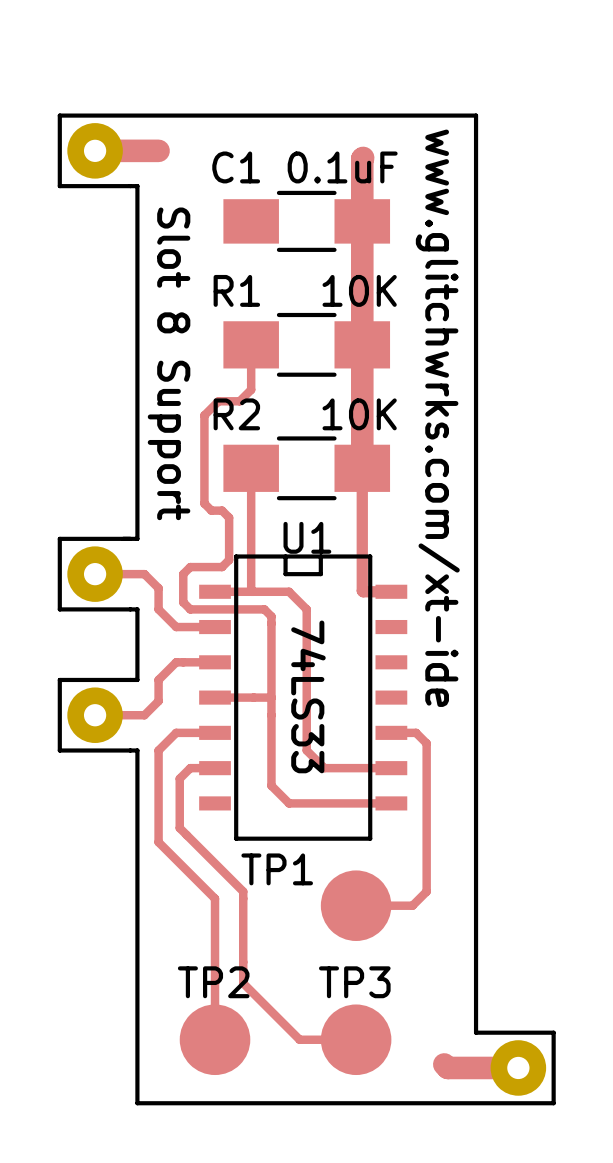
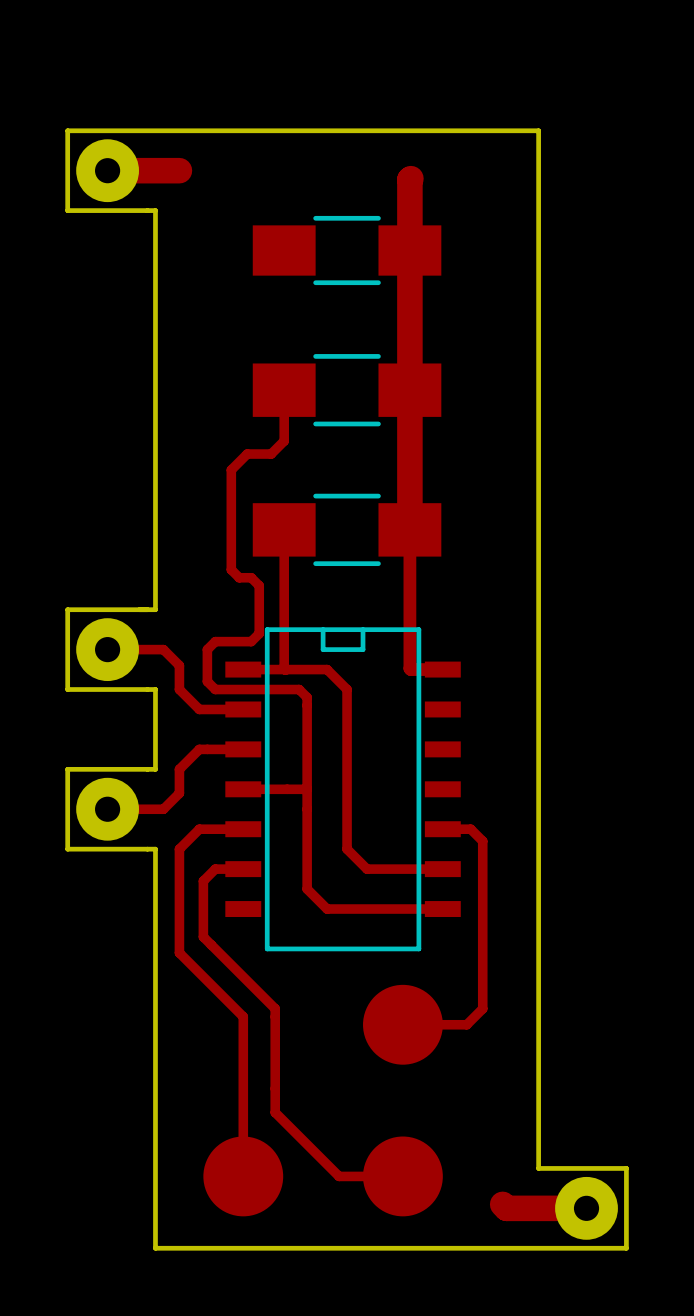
C1 name: C1 (236, 167) -> none
C1 value: 0.1uF (342, 167) -> none
R1 name: R1 (236, 290) -> none
R1 value: 10K (359, 290) -> none
text: Slot 8 Support (169, 363) -> none
R2 name: R2 (236, 414) -> none
R2 value: 10K (359, 414) -> none
text: www.glitchwrks.com/xt-ide (437, 418) -> none
U1 name: U1 (307, 537) -> none
text: 74LS33 (308, 696) -> none
TP1 name: TP1 (277, 869) -> none
TP2 name: TP2 (213, 982) -> none
TP3 name: TP3 (354, 982) -> none

